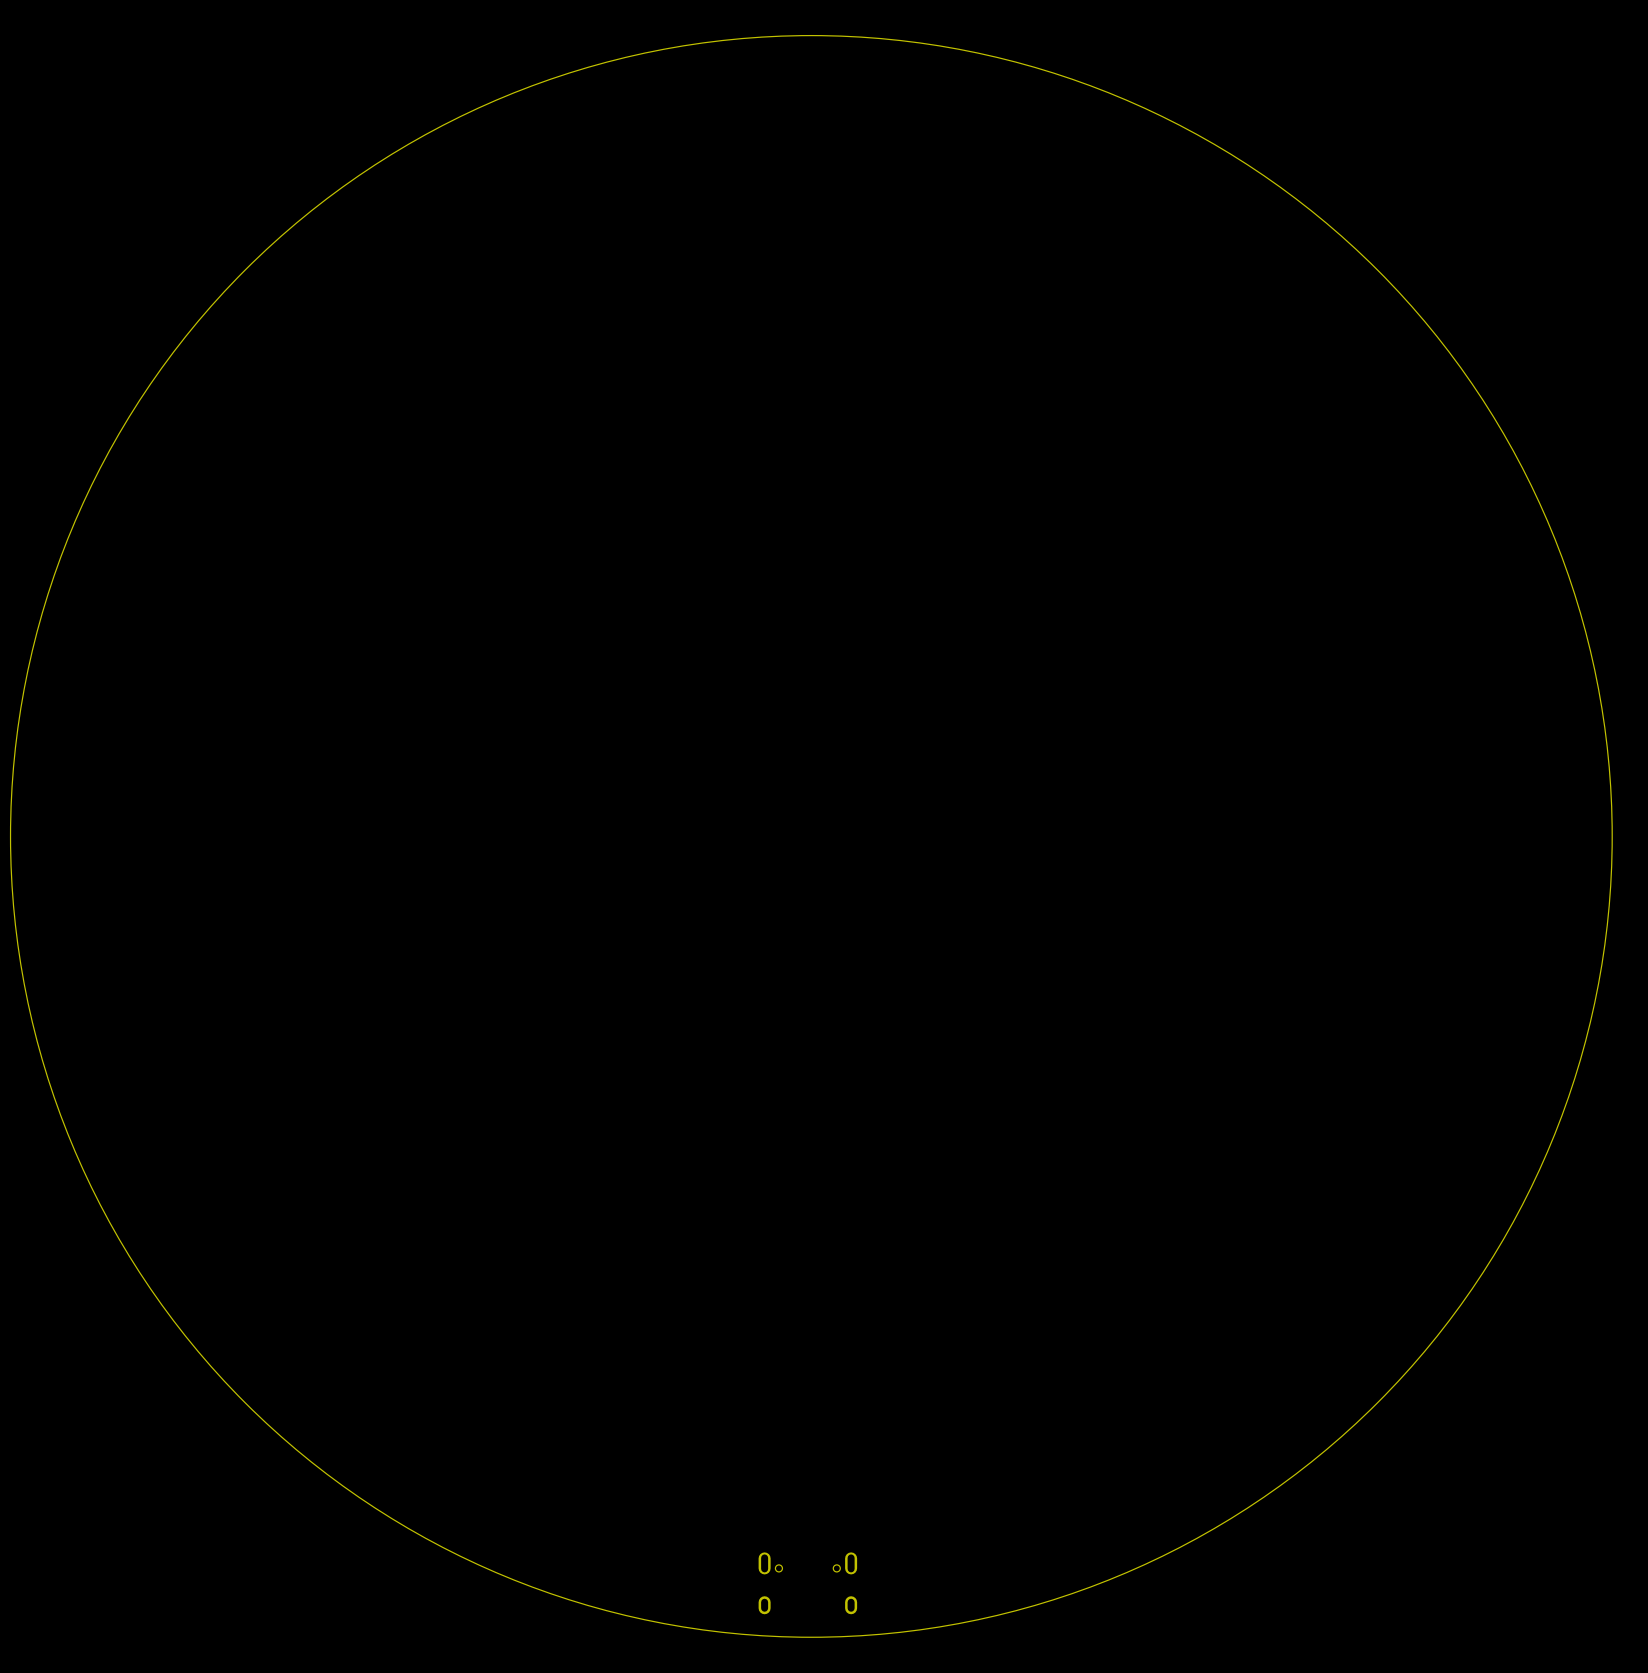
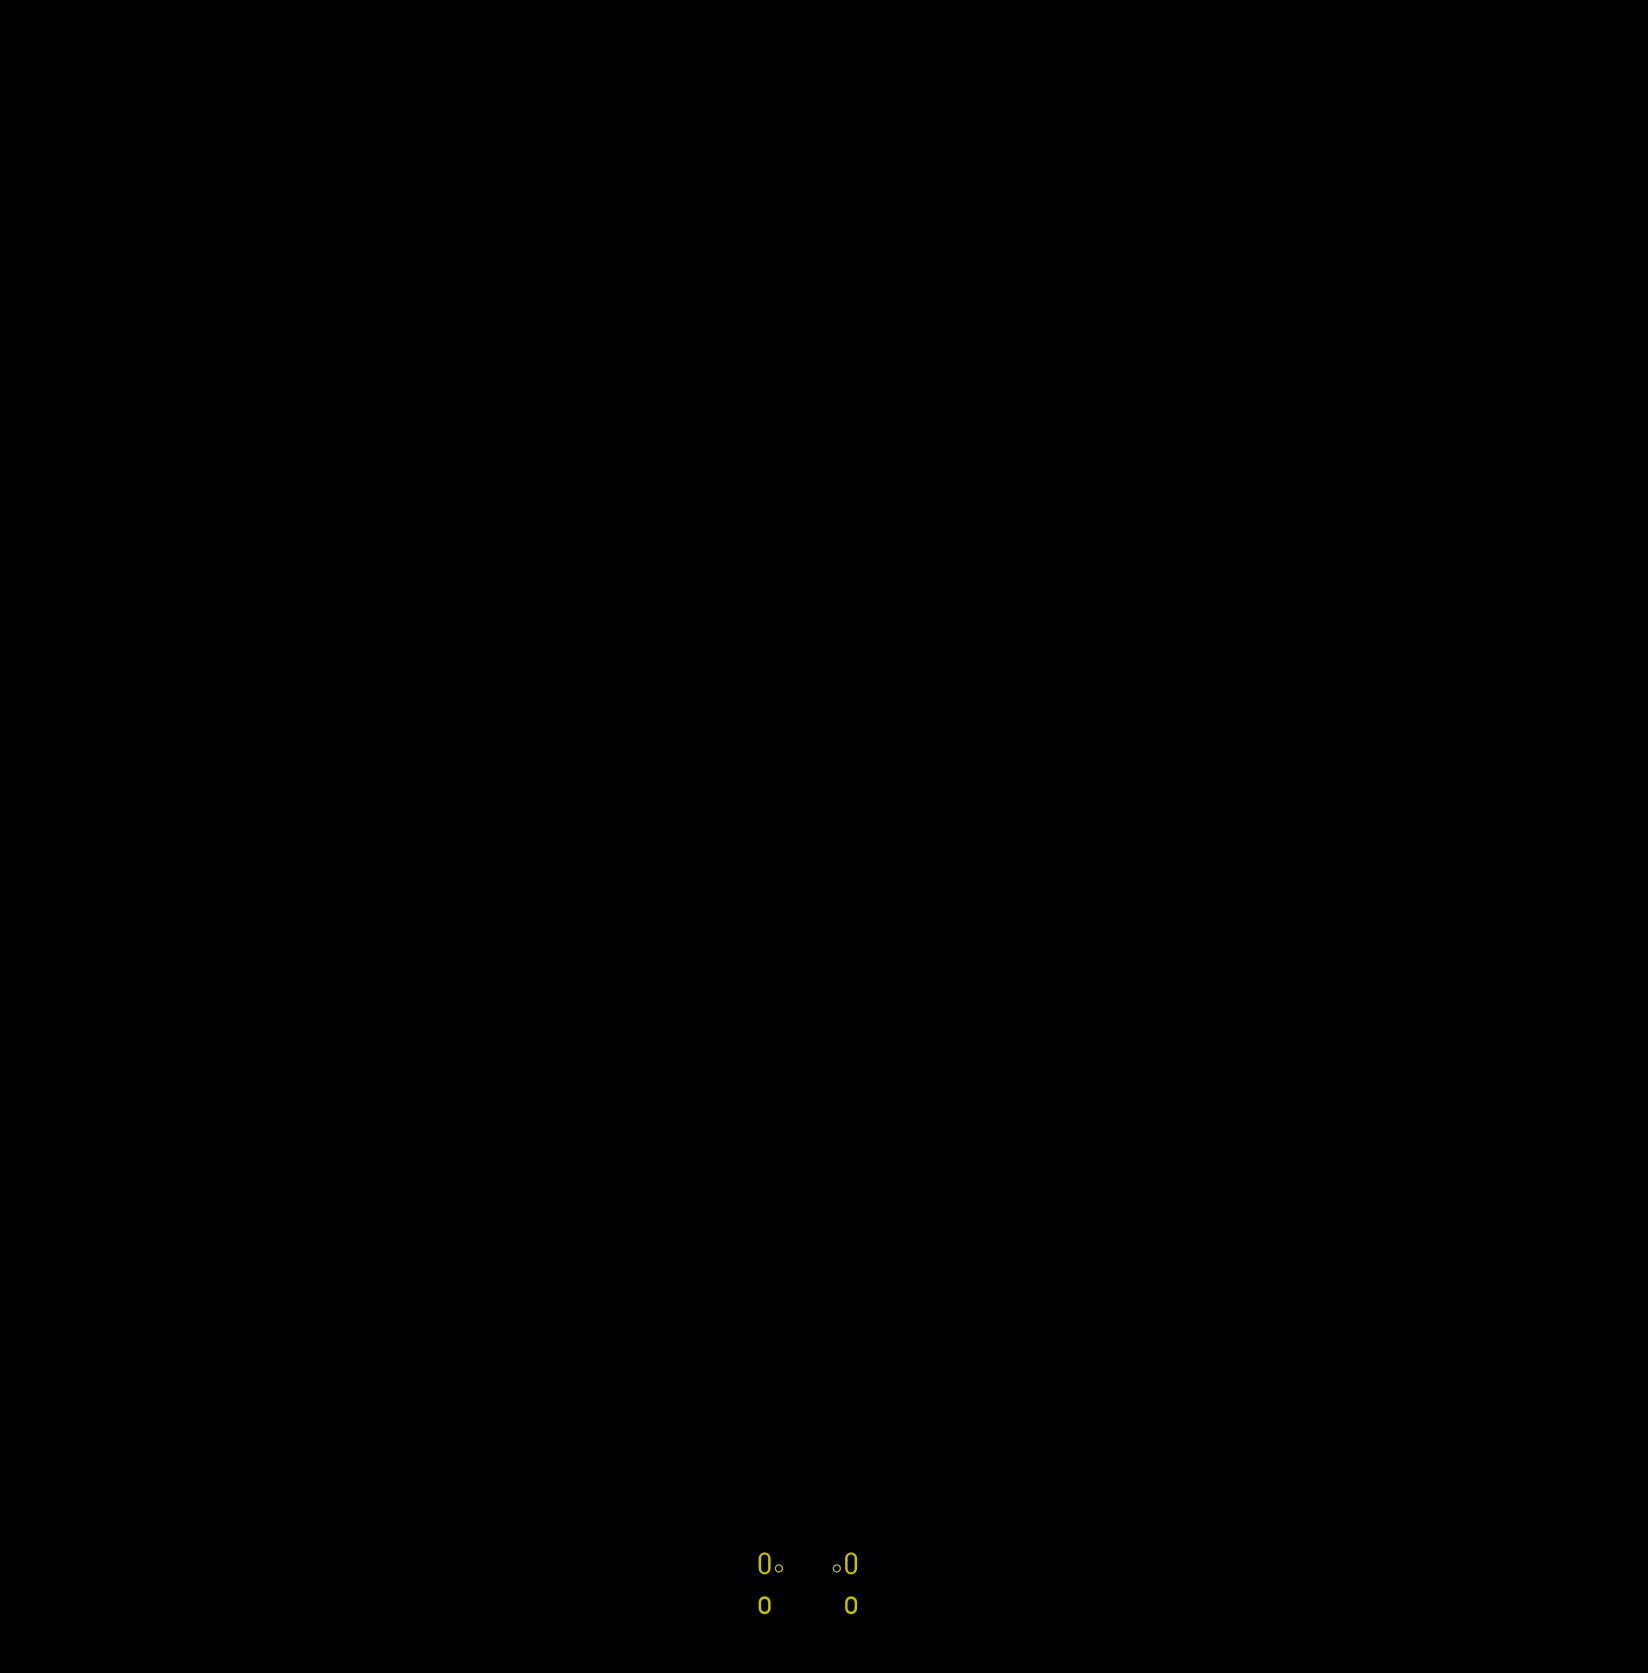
round board edge: [10, 35, 1613, 1638] -> none

